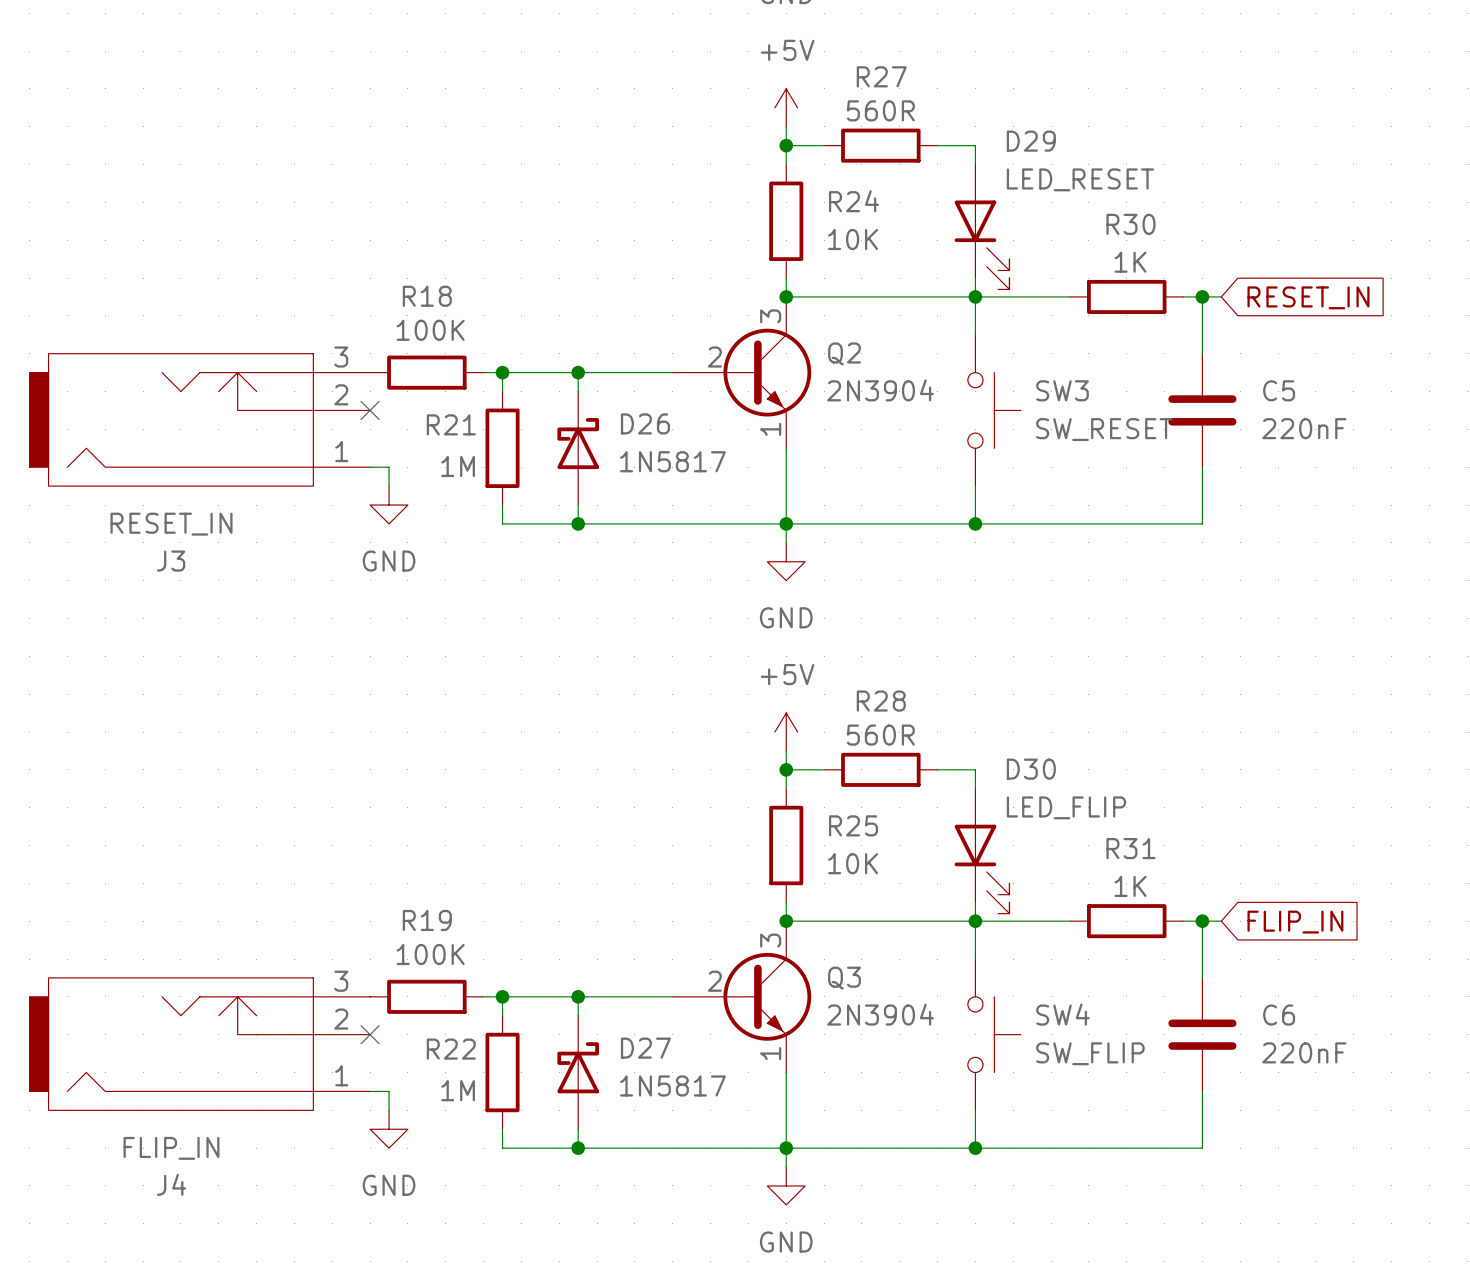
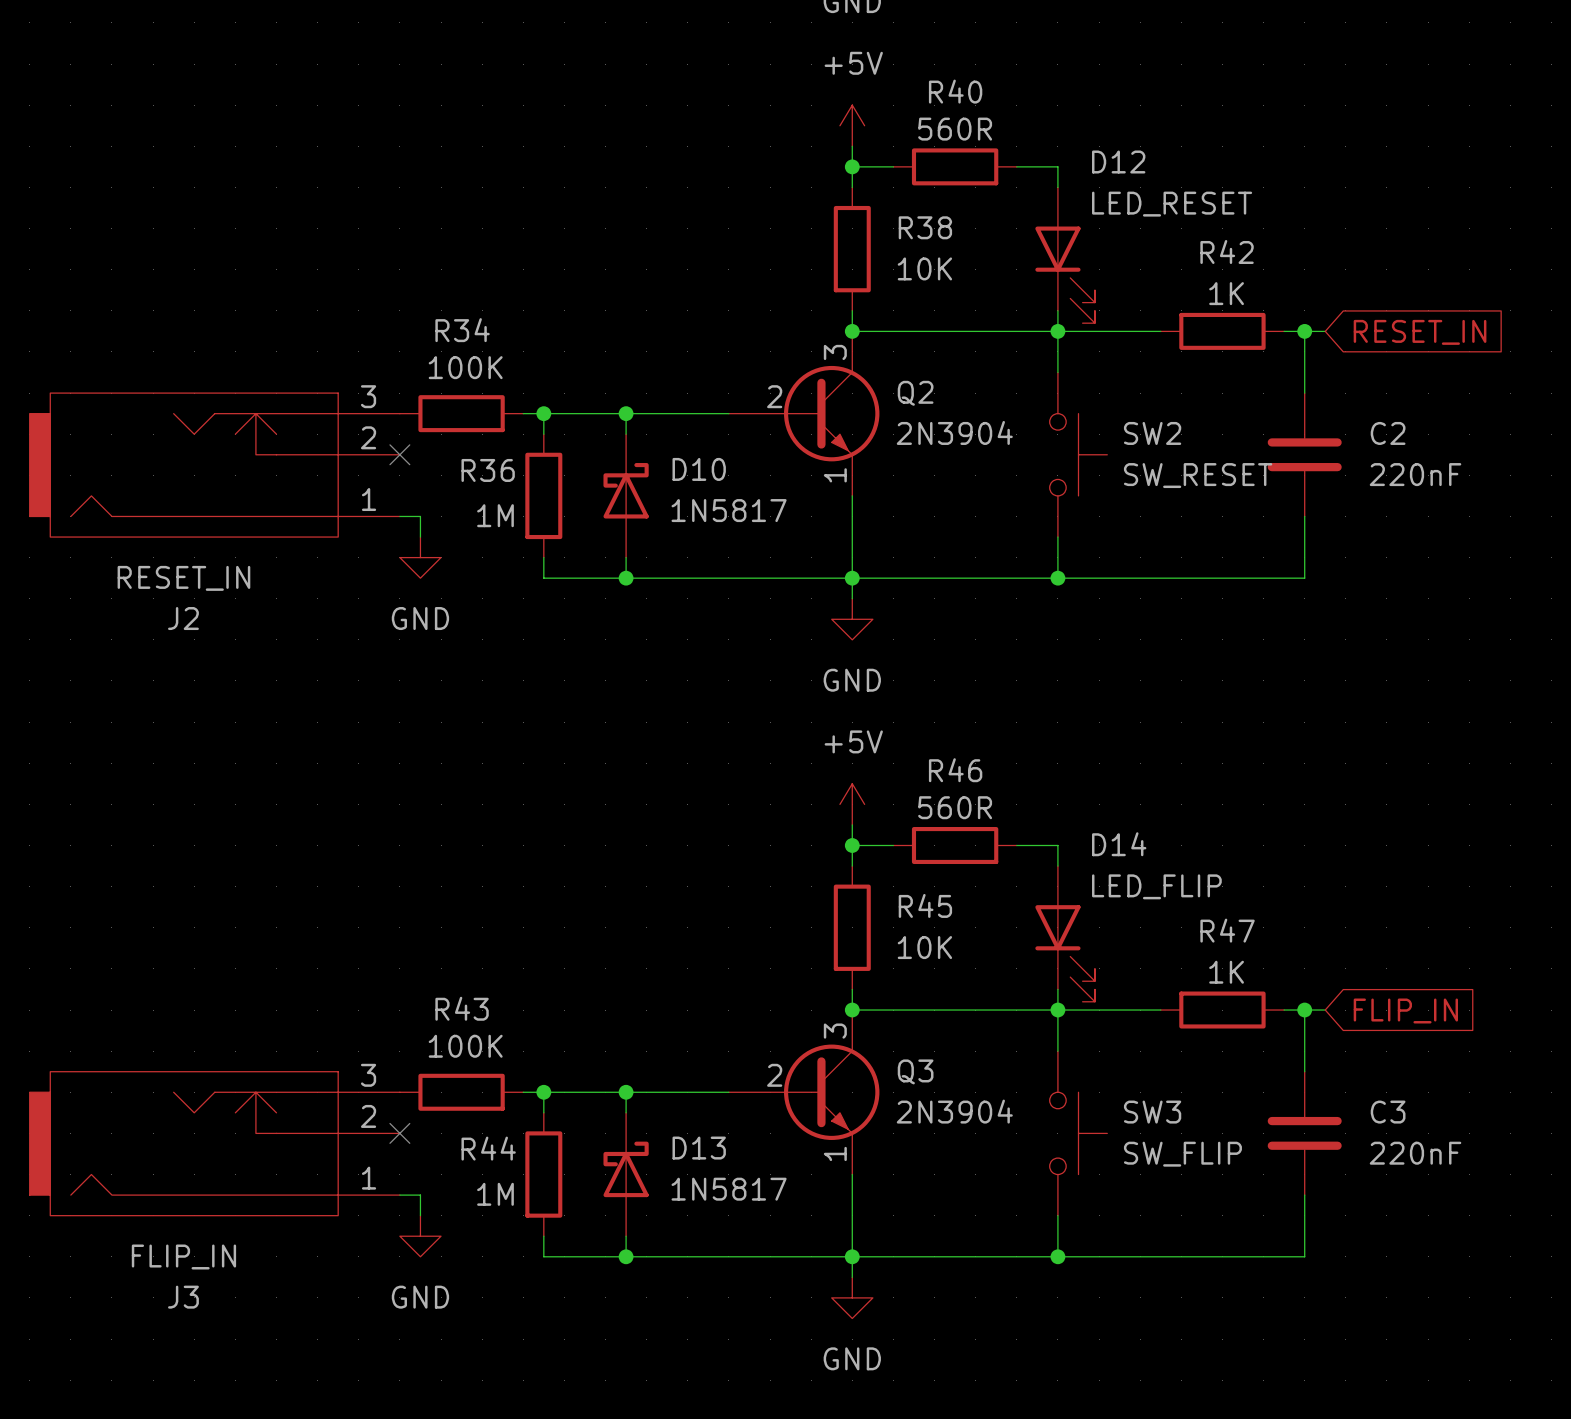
R27 name: R27 (881, 76) -> R40 (955, 91)
D29 name: D29 (1031, 141) -> D12 (1118, 162)
R24 name: R24 (853, 201) -> R38 (925, 227)
R30 name: R30 (1130, 224) -> R42 (1227, 251)
R18 name: R18 (427, 296) -> R34 (462, 330)
SW3 name: SW3 (1062, 390) -> SW2 (1152, 433)
C5 name: C5 (1279, 390) -> C2 (1388, 433)
D26 name: D26 (645, 423) -> D10 (699, 469)
R21 name: R21 (451, 424) -> R36 (488, 470)
J3 name: J3 (171, 561) -> J2 (183, 618)
R28 name: R28 (881, 701) -> R46 (955, 770)
D30 name: D30 (1031, 769) -> D14 (1119, 844)
R25 name: R25 (853, 825) -> R45 (925, 905)
R31 name: R31 (1130, 848) -> R47 (1227, 930)
R19 name: R19 (427, 920) -> R43 (462, 1008)
SW4 name: SW4 (1062, 1014) -> SW3 (1152, 1112)
C6 name: C6 (1279, 1015) -> C3 (1388, 1112)
D27 name: D27 (645, 1048) -> D13 (699, 1148)
R22 name: R22 (451, 1049) -> R44 (488, 1148)
J4 name: J4 (171, 1184) -> J3 (183, 1297)

